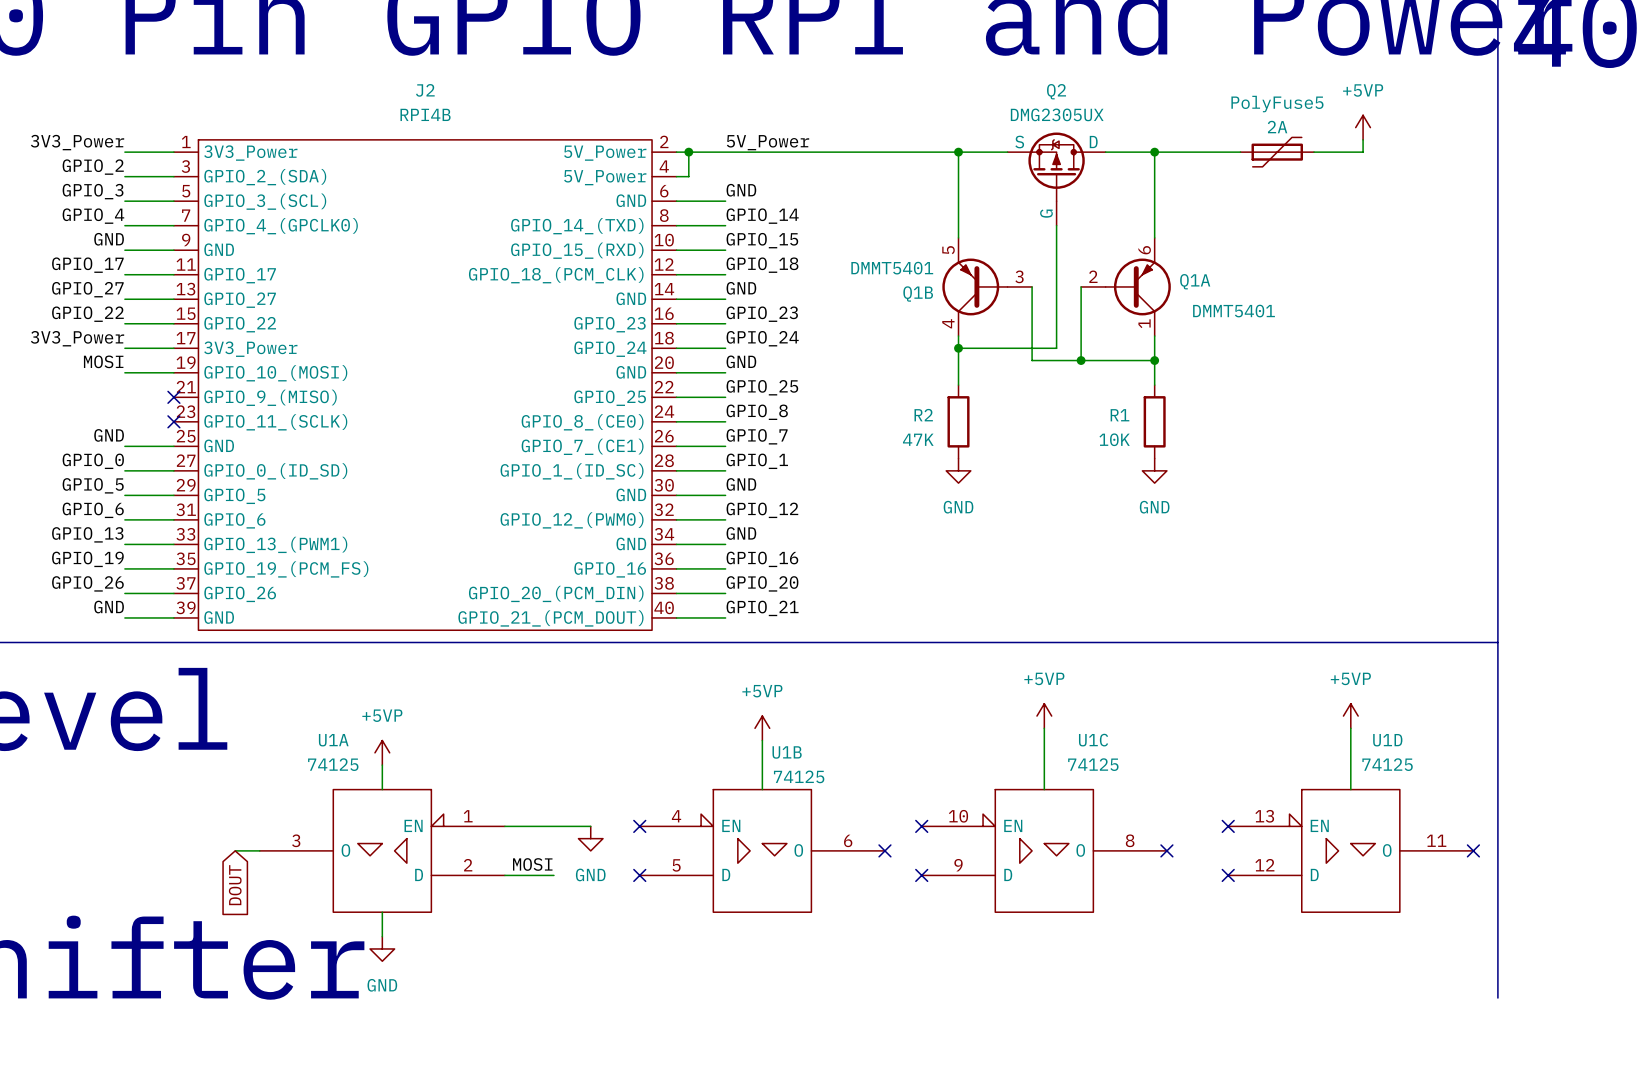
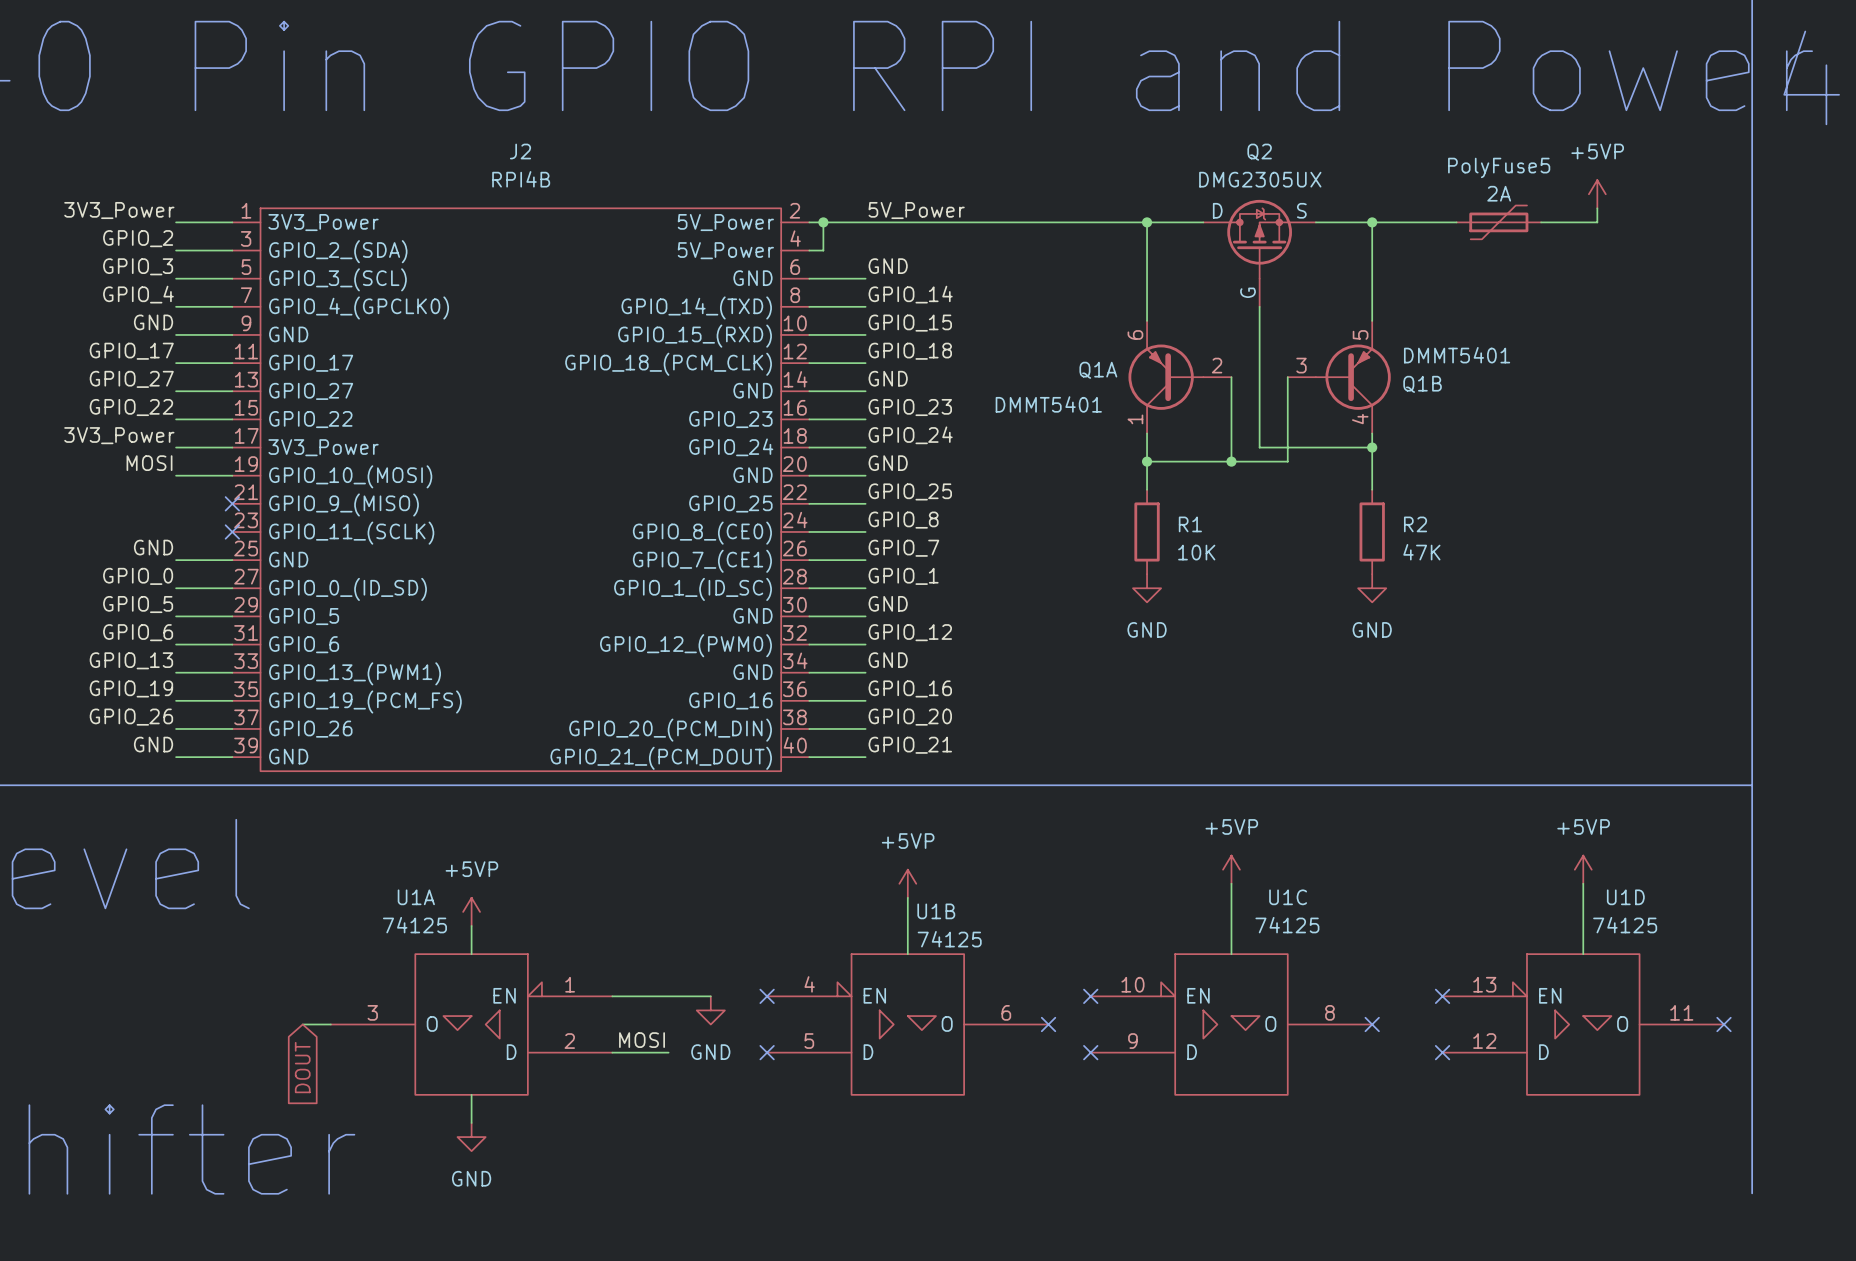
wire: (958, 152) (958, 237) -> (1147, 222) (1147, 320)
junction position: (958, 152) -> (1147, 222)
wire: (1154, 152) (1154, 237) -> (1372, 222) (1372, 320)
junction position: (1154, 152) -> (1372, 222)
Q2 flip: as is (1056, 166) -> left-right (1259, 239)
wire: (1056, 225) (1056, 348) (958, 348) -> none
wire: none -> (1259, 306) (1259, 447) (1372, 447)
Q1B flip: as is (974, 286) -> left-right (1353, 377)
Q1B position: (987, 286) -> (1339, 377)
wire: (1032, 286) (1032, 360) -> (1147, 461) (1217, 461)
wire: (1081, 286) (1081, 360) -> (1231, 377) (1231, 461)
Q1A position: (1125, 286) -> (1179, 377)
Q1A flip: as is (1138, 286) -> left-right (1165, 377)
wire: (958, 336) (958, 385) -> (1147, 433) (1147, 489)
wire: (1154, 336) (1154, 385) -> (1372, 433) (1372, 489)
junction position: (958, 348) -> (1147, 461)
junction position: (1081, 360) -> (1231, 461)
wire: (1093, 360) (1154, 360) -> (1287, 461) (1287, 377)
junction position: (1154, 360) -> (1372, 447)
R2 name position: R2 (923, 415) -> R2 (1415, 524)
R1 name position: R1 (1119, 415) -> R1 (1190, 524)
R2 position: (958, 421) -> (1372, 531)
R1 position: (1154, 421) -> (1147, 531)
R2 value position: 47K (918, 439) -> 47K (1421, 552)
R1 value position: 10K (1114, 439) -> 10K (1196, 552)
power symbol position: GND (958, 470) -> GND (1147, 588)
power symbol position: GND (1154, 470) -> GND (1372, 588)

